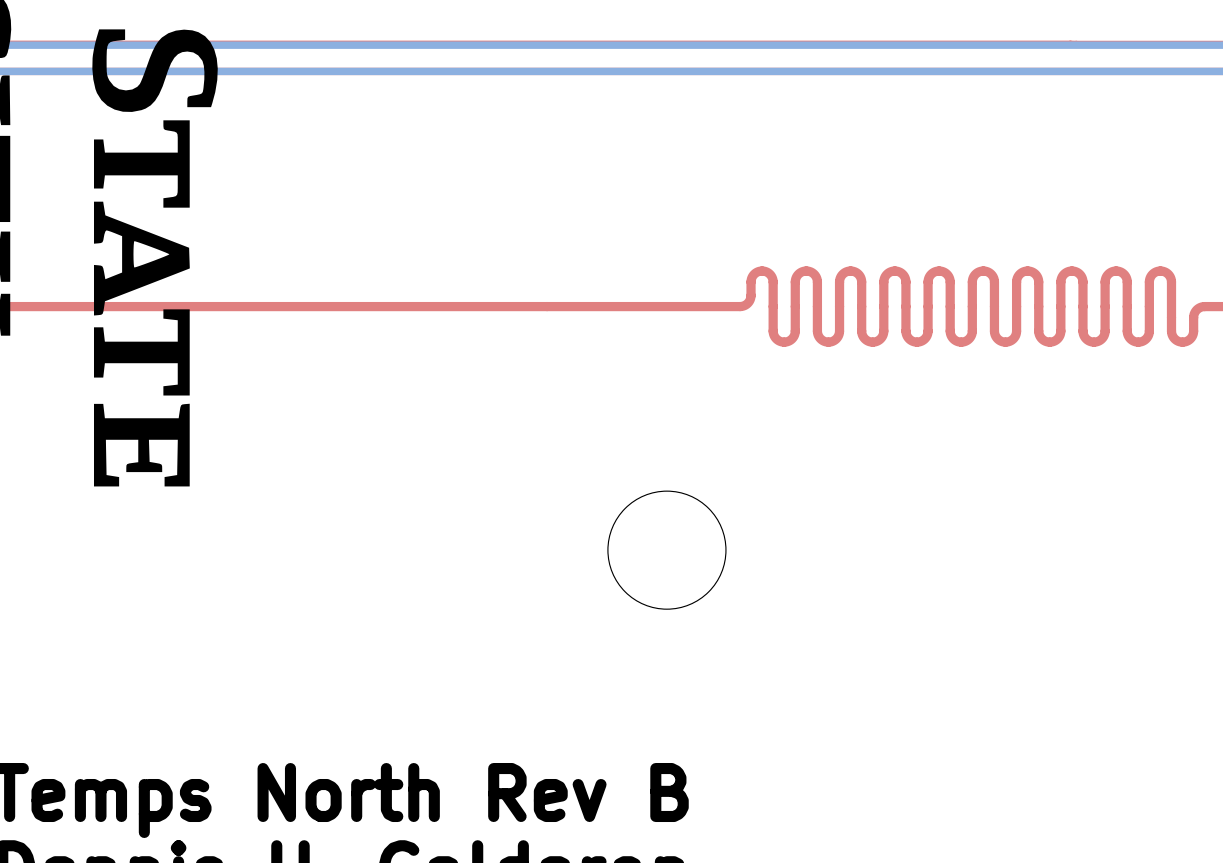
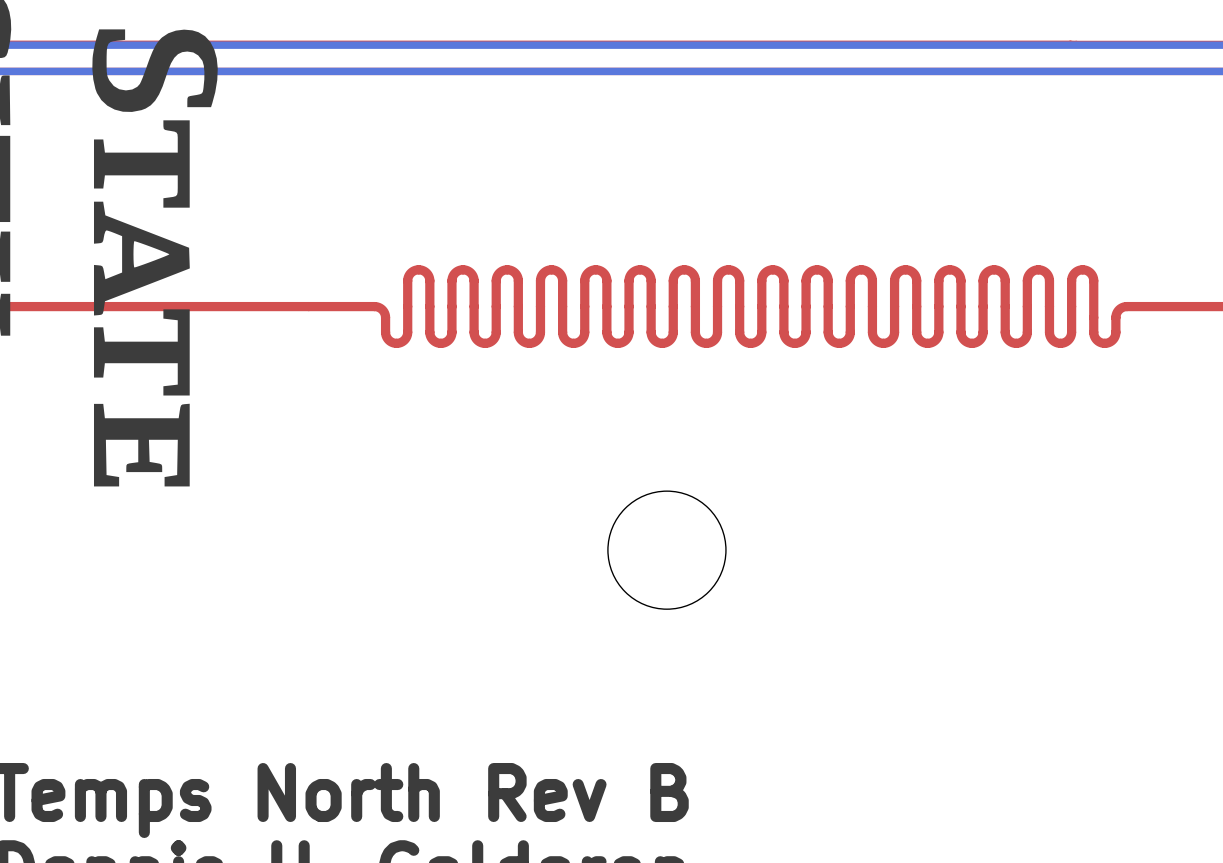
top track: (1204, 306) (1195, 312) (1192, 335) (1189, 339) (1182, 342) (1175, 339) (1171, 332) (1171, 279) (1167, 273) (1160, 271) (1153, 273) (1149, 279) (1149, 332) (1146, 338) (1138, 342) (1131, 339) (1127, 332) (1126, 279) (1122, 273) (1116, 271) (1109, 273) (1105, 279) (1105, 332) (1100, 339) (1094, 342) (1086, 338) (1083, 332) (1082, 279) (1078, 273) (1071, 271) (1064, 274) (1060, 280) (1060, 333) (1056, 339) (1049, 342) (1043, 339) (1039, 333) (1038, 280) (1035, 274) (1027, 271) (1020, 273) (1016, 280) (1016, 333) (1012, 339) (1005, 342) (998, 339) (994, 332) (994, 279) (990, 273) (983, 271) (975, 274) (972, 280) (971, 333) (968, 339) (961, 342) (953, 338) (950, 332) (949, 279) (945, 273) (939, 271) (932, 273) (928, 279) (927, 332) (924, 338) (917, 342) (910, 339) (906, 333) (905, 280) (902, 274) (896, 271) (889, 272) (884, 279) (883, 332) (880, 338) (874, 342) (867, 340) (862, 333) (861, 280) (858, 274) (852, 271) (845, 272) (839, 279) (839, 332) (836, 338) (829, 342) (822, 340) (817, 333) (817, 280) (814, 274) (807, 271) (800, 272) (795, 279) (795, 332) (792, 338) (785, 342) (778, 340) (773, 333) (773, 280) (769, 274) (763, 271) (757, 271) (752, 276) (750, 299) (741, 306) (374, 306) -> (1204, 306) (1122, 307) (1116, 314) (1114, 337) (1104, 343) (1098, 341) (1093, 333) (1093, 277) (1089, 272) (1082, 269) (1074, 273) (1071, 279) (1071, 335) (1067, 341) (1060, 343) (1052, 340) (1049, 333) (1049, 277) (1045, 272) (1038, 269) (1030, 273) (1027, 279) (1026, 335) (1023, 341) (1016, 343) (1008, 340) (1005, 333) (1004, 277) (1000, 272) (994, 269) (986, 273) (983, 279) (982, 335) (978, 341) (972, 343) (964, 340) (961, 333) (960, 277) (956, 272) (949, 269) (943, 272) (939, 277) (938, 333) (934, 341) (927, 343) (921, 341) (917, 335) (916, 279) (913, 273) (907, 269) (900, 271) (894, 277) (894, 333) (891, 340) (884, 343) (877, 341) (872, 335) (872, 279) (869, 273) (862, 269) (855, 271) (850, 277) (850, 333) (847, 340) (840, 343) (833, 341) (828, 335) (828, 279) (824, 273) (818, 269) (811, 271) (806, 277) (805, 333) (802, 340) (796, 343) (789, 341) (784, 335) (783, 279) (780, 273) (774, 269) (767, 271) (762, 277) (761, 333) (758, 340) (752, 343) (745, 341) (740, 335) (739, 279) (736, 273) (730, 269) (723, 271) (717, 277) (717, 333) (714, 340) (707, 343) (700, 341) (695, 335) (695, 279) (692, 273) (685, 269) (678, 271) (673, 277) (673, 333) (670, 340) (663, 343) (656, 341) (651, 335) (651, 279) (647, 273) (641, 269) (634, 271) (629, 277) (628, 333) (625, 340) (619, 343) (612, 341) (607, 335) (606, 279) (603, 273) (597, 269) (590, 271) (585, 277) (584, 333) (581, 340) (575, 343) (568, 341) (562, 335) (562, 279) (559, 273) (552, 269) (546, 271) (540, 277) (540, 333) (537, 340) (532, 342) (523, 341) (518, 335) (518, 279) (516, 274) (510, 270) (501, 271) (496, 277) (496, 333) (492, 340) (488, 342) (479, 341) (474, 335) (474, 279) (471, 274) (465, 270) (457, 271) (452, 277) (451, 333) (445, 342) (436, 342) (430, 335) (429, 279) (424, 271) (414, 270) (408, 277) (407, 333) (403, 341) (395, 343) (387, 339) (385, 333) (384, 313) (381, 308) (374, 306)

